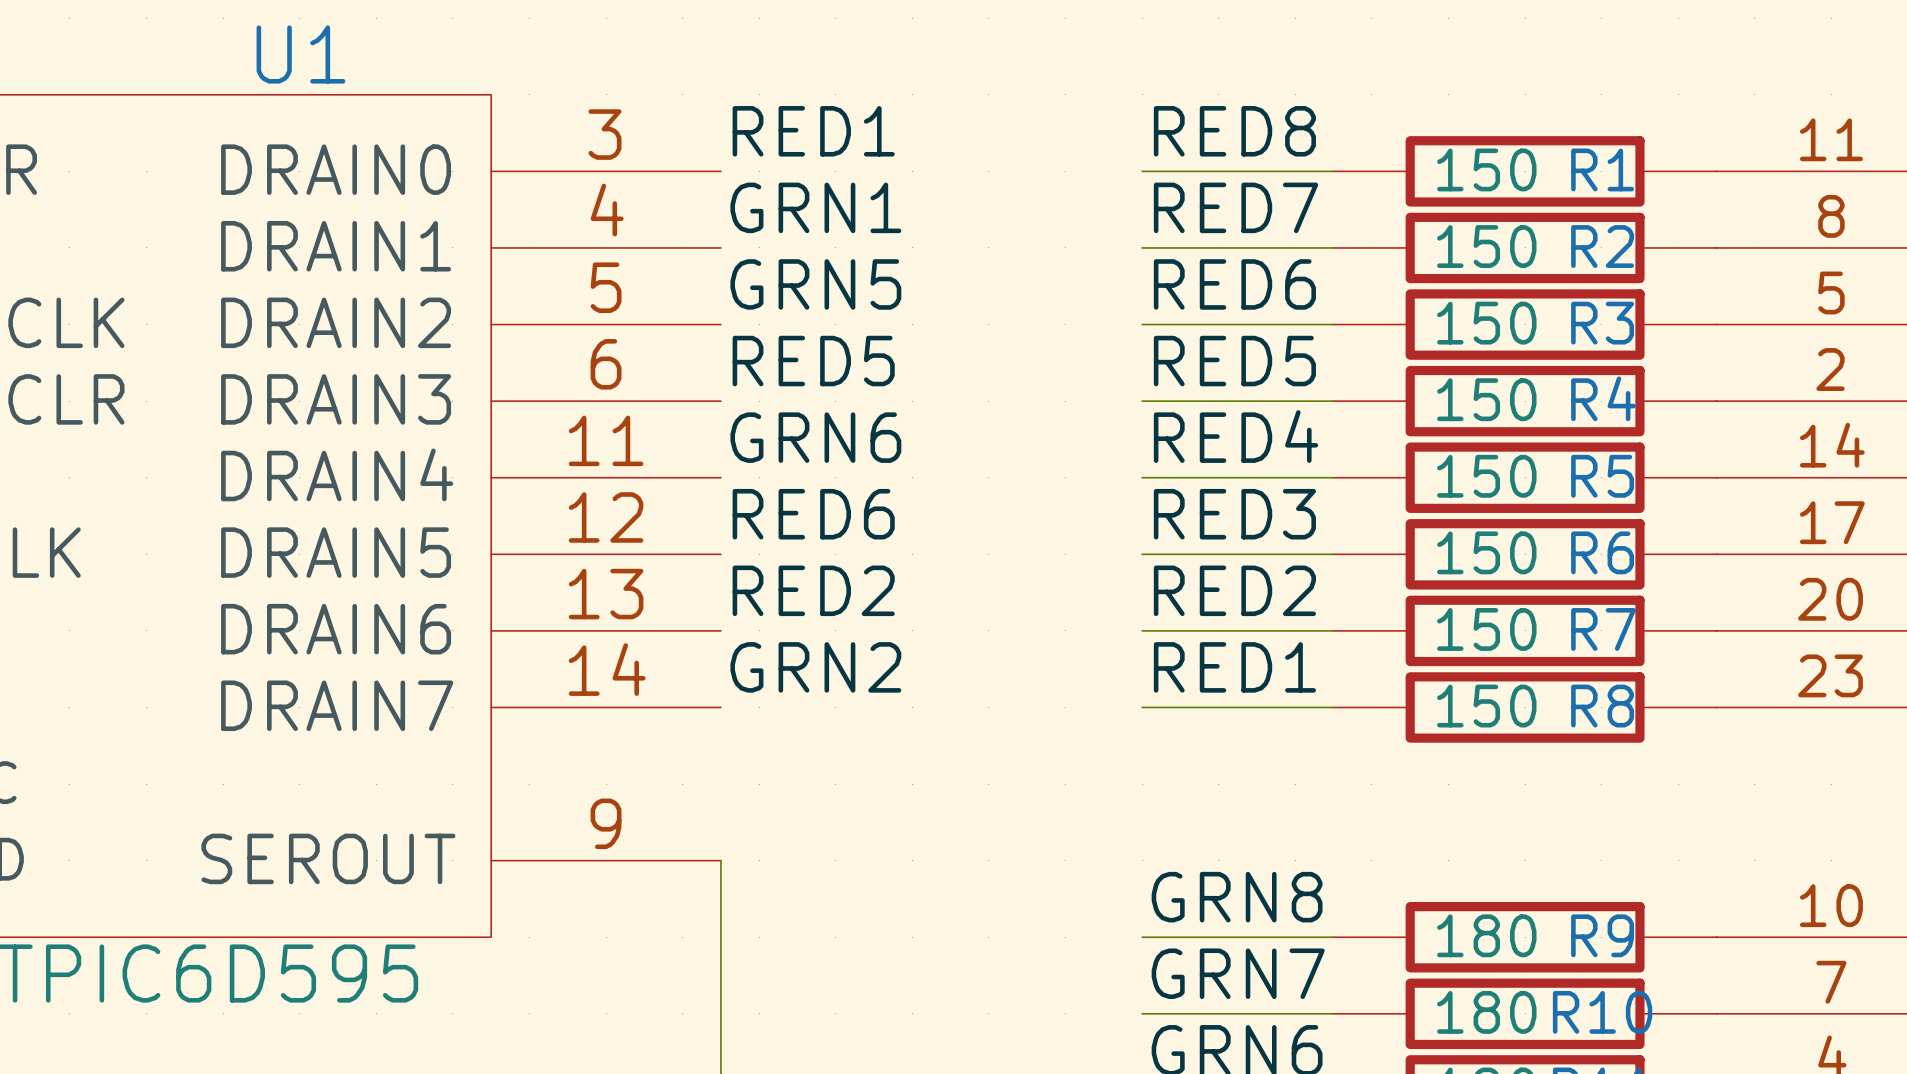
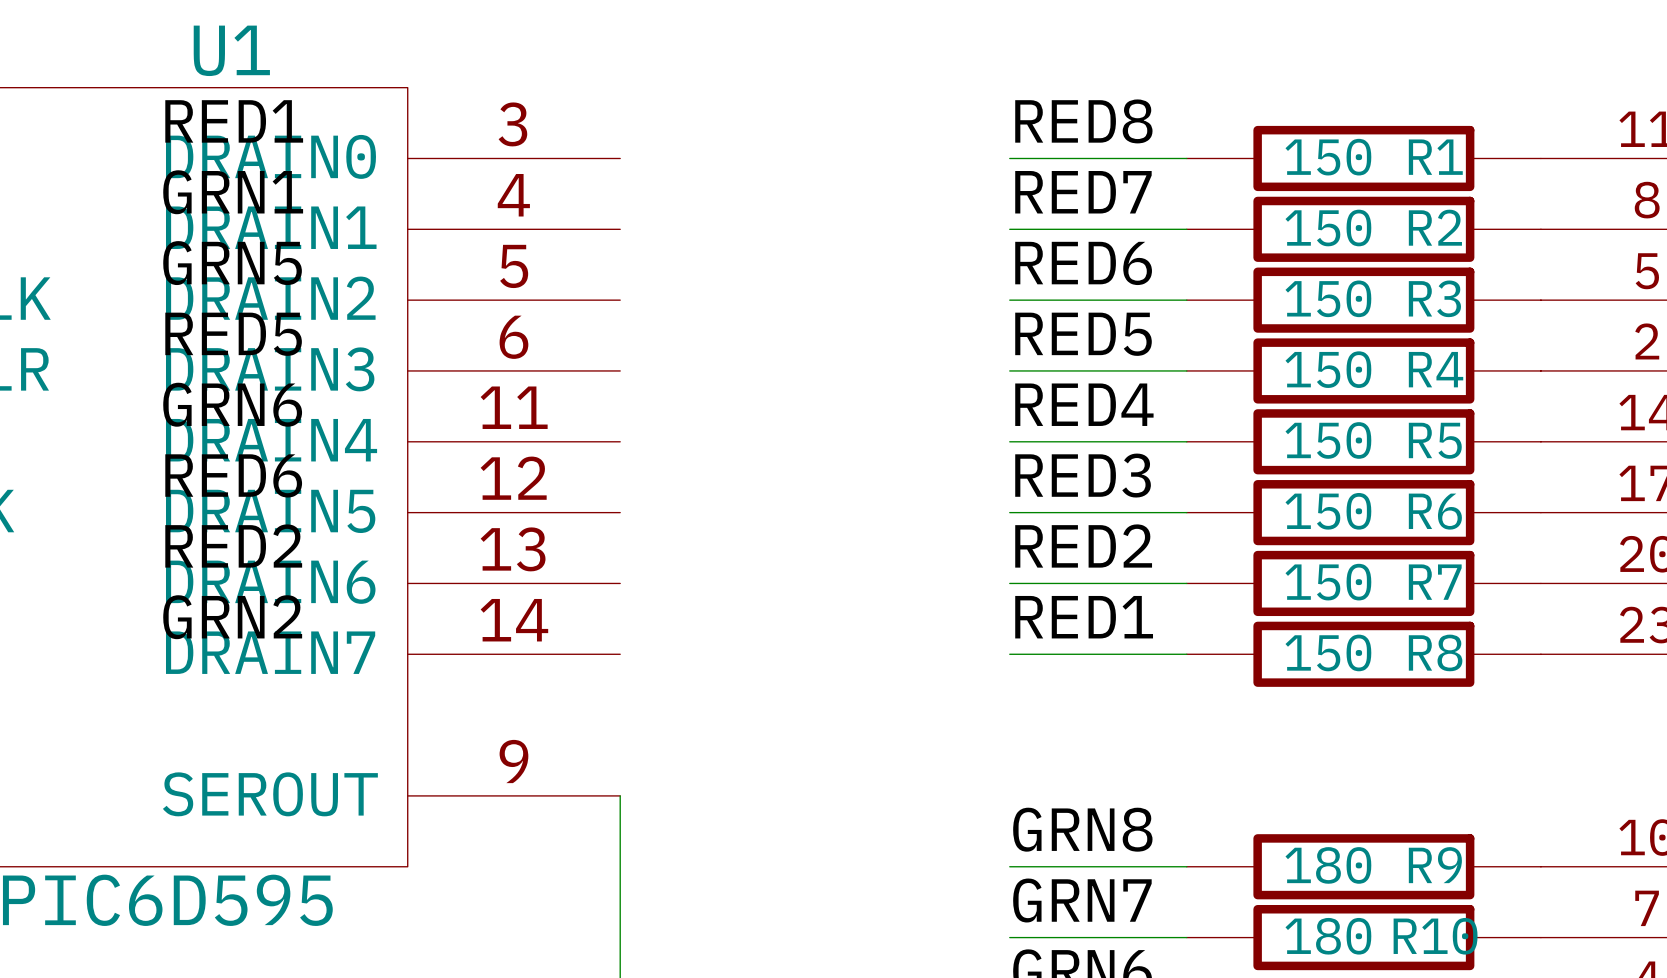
label position: RED1 (813, 131) -> RED1 (234, 121)
label position: GRN1 (815, 207) -> GRN1 (233, 192)
label position: GRN5 (815, 284) -> GRN5 (232, 263)
label position: RED5 (813, 361) -> RED5 (233, 334)
label position: GRN6 (815, 437) -> GRN6 (232, 404)
label position: RED6 (813, 514) -> RED6 (233, 475)
label position: RED2 (813, 590) -> RED2 (233, 546)
label position: GRN2 (815, 667) -> GRN2 (232, 617)

